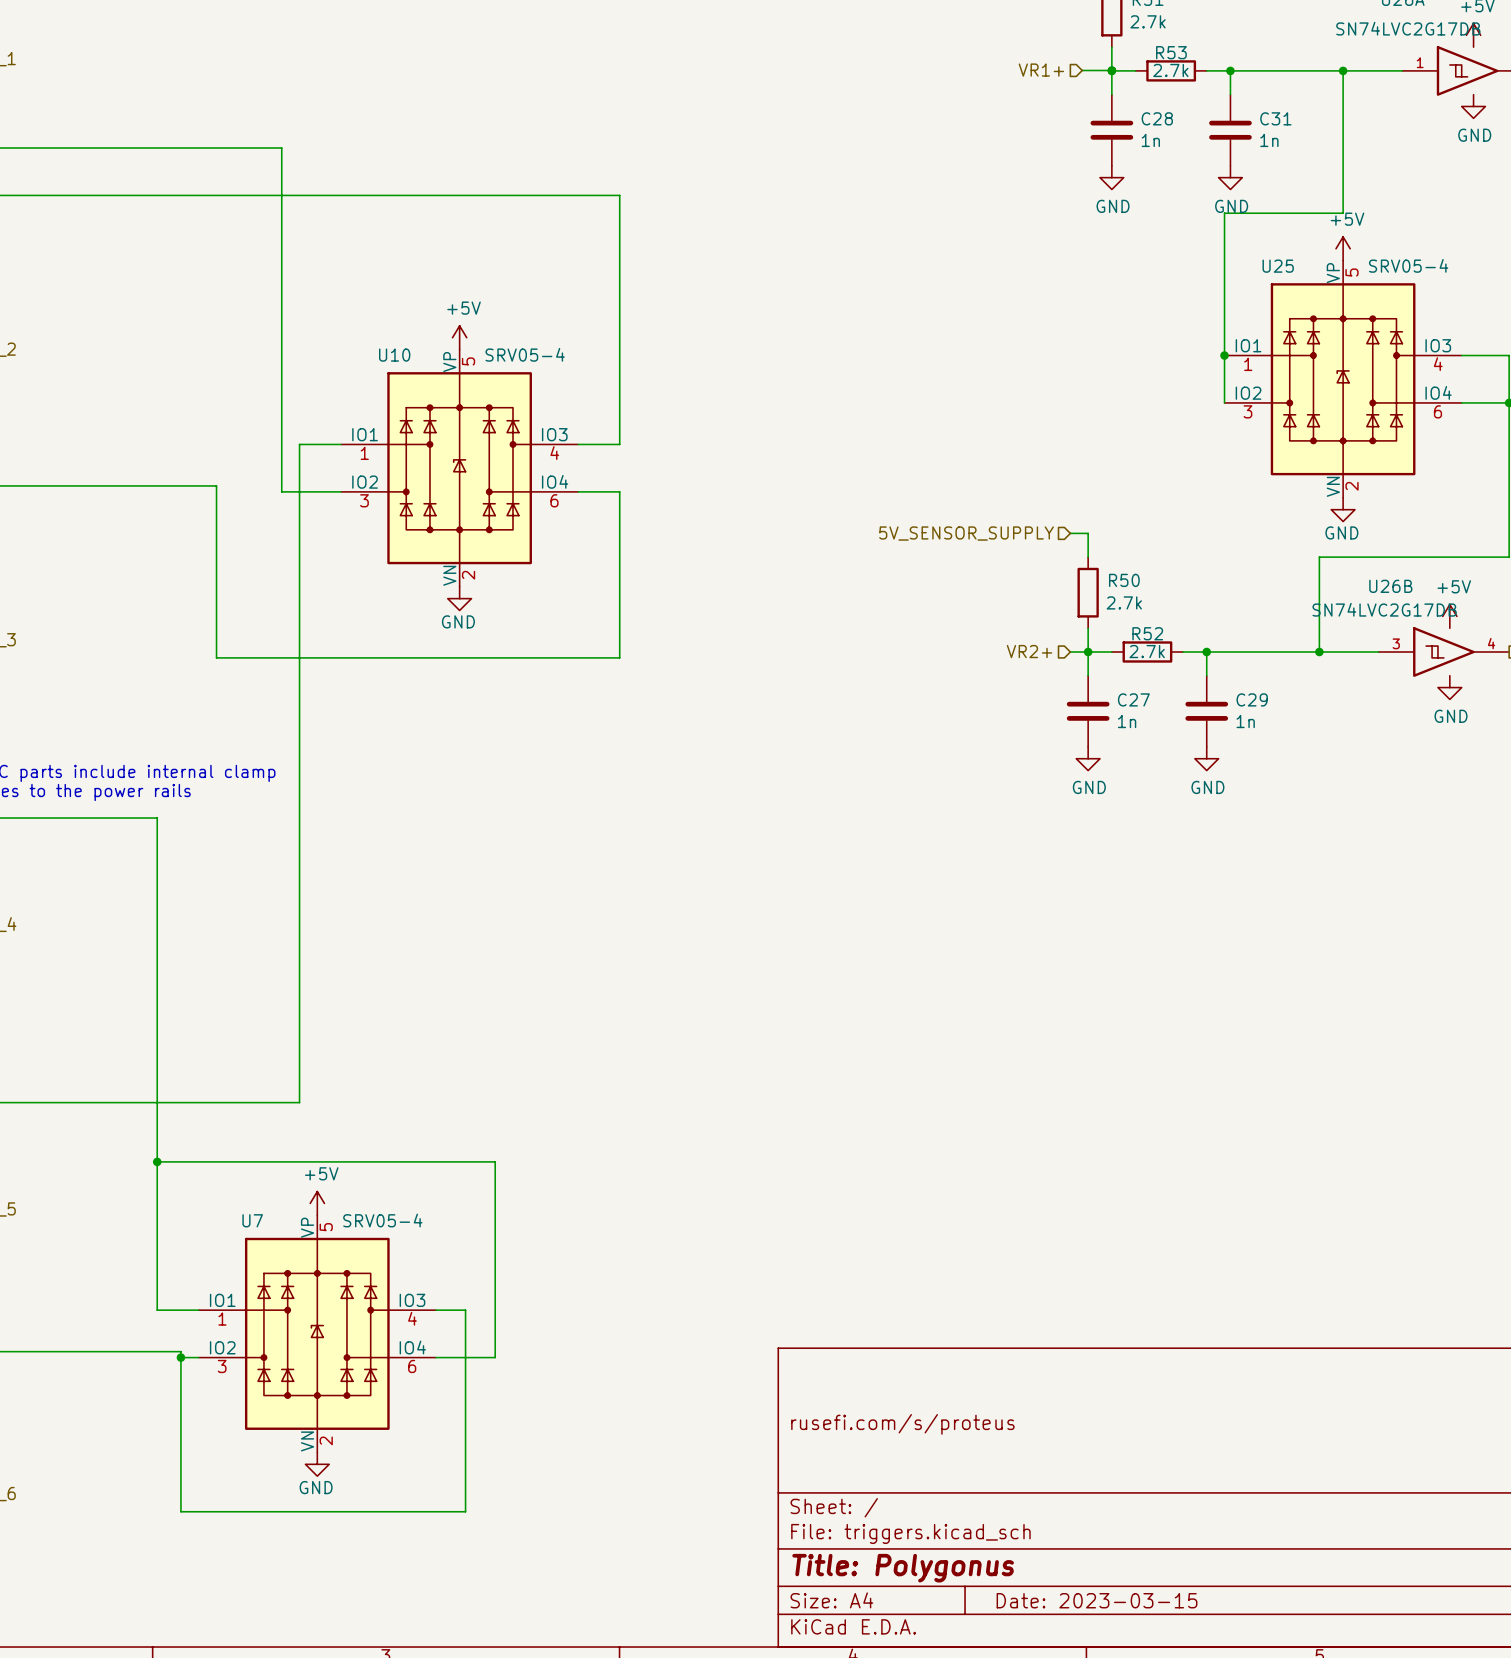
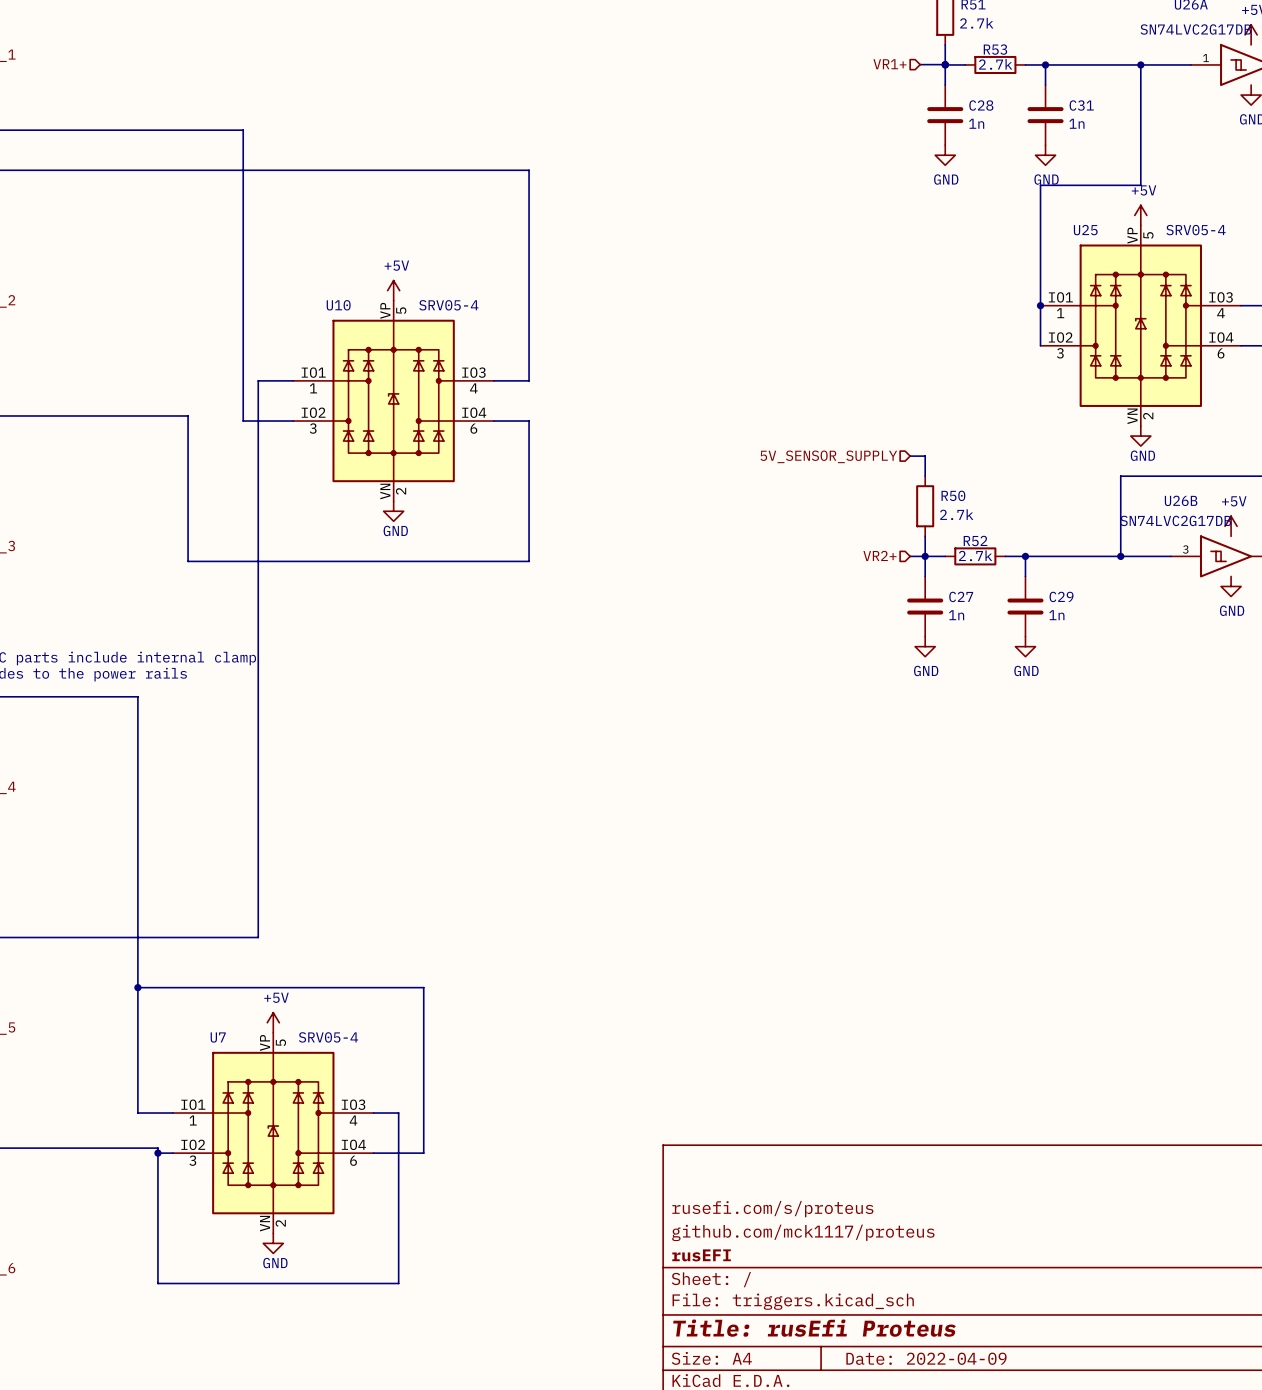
title block: none -> github.com/mck1117/proteus (803, 1232)
title block: none -> rusEFI (701, 1255)
title block: Title: Polygonus (903, 1568) -> Title: rusEfi Proteus (814, 1328)
title block: Date: 2023-03-15 (1097, 1600) -> Date: 2022-04-09 (926, 1358)

